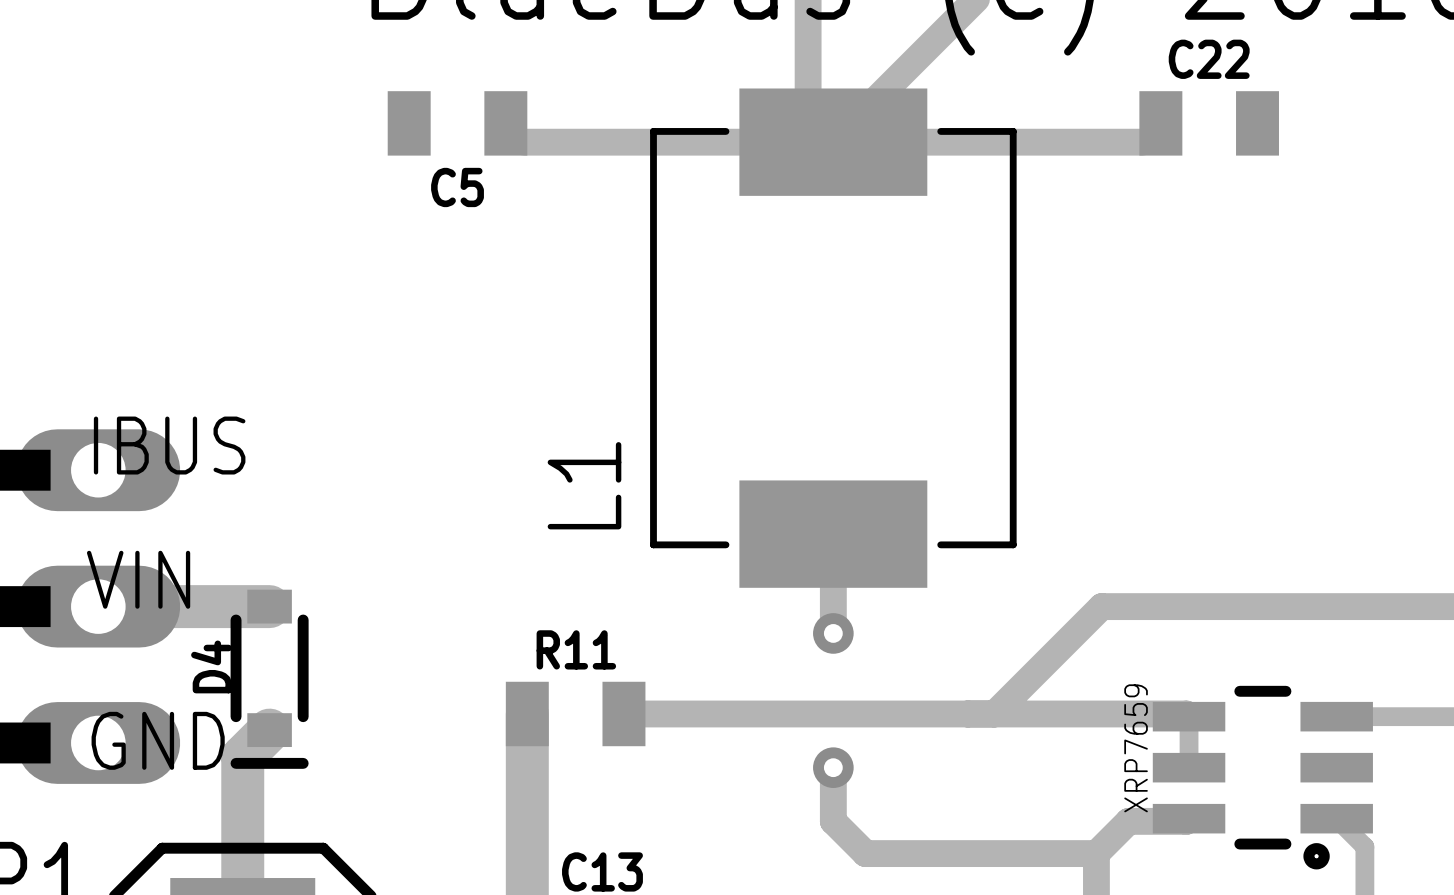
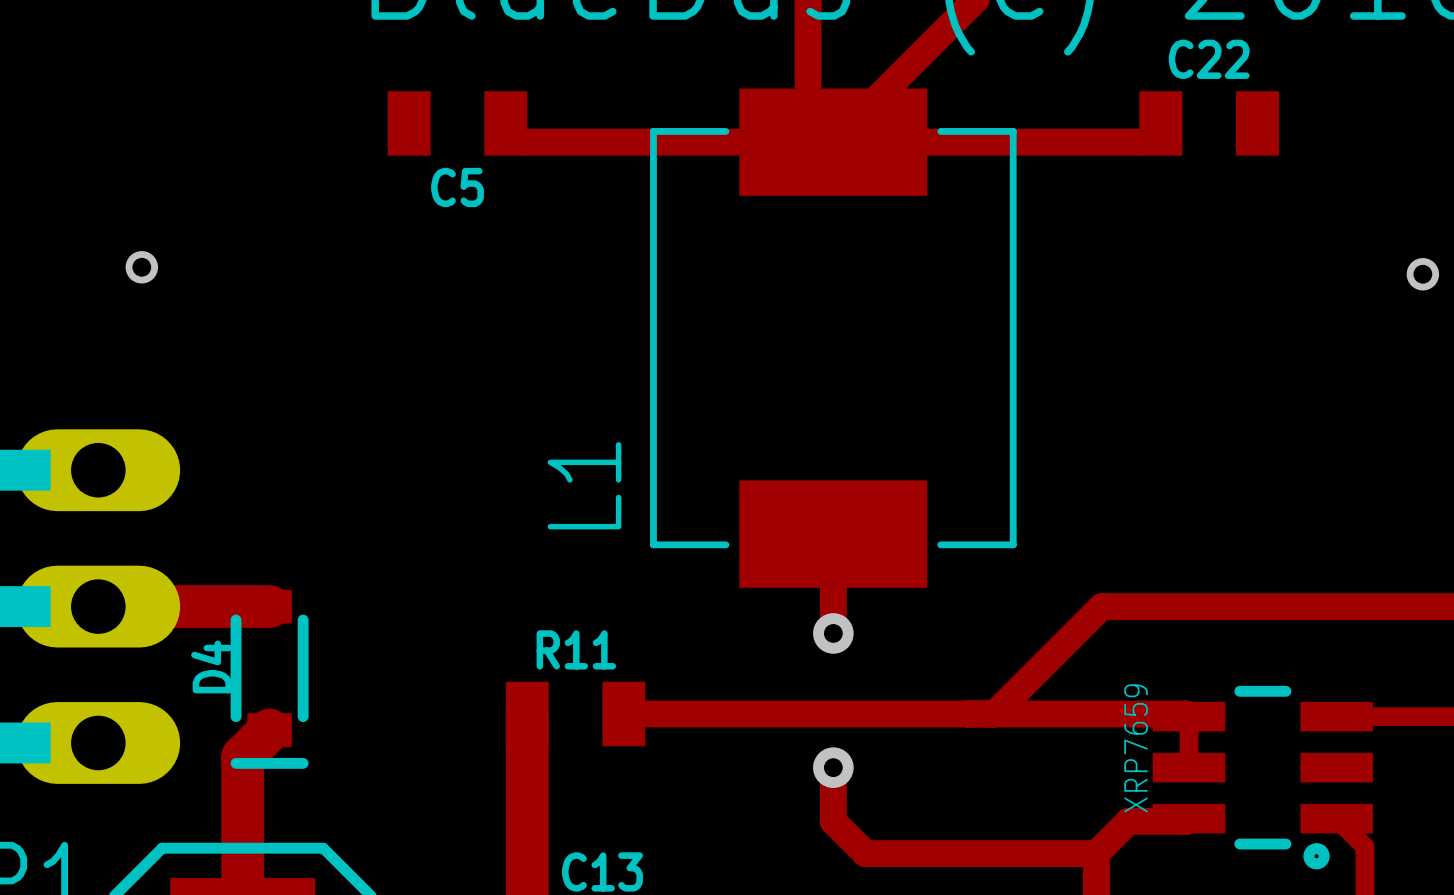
via: none -> (141, 267)
via: none -> (1422, 274)
text: IBUS (169, 445) -> none
text: VIN (138, 579) -> none
text: GND (158, 740) -> none

